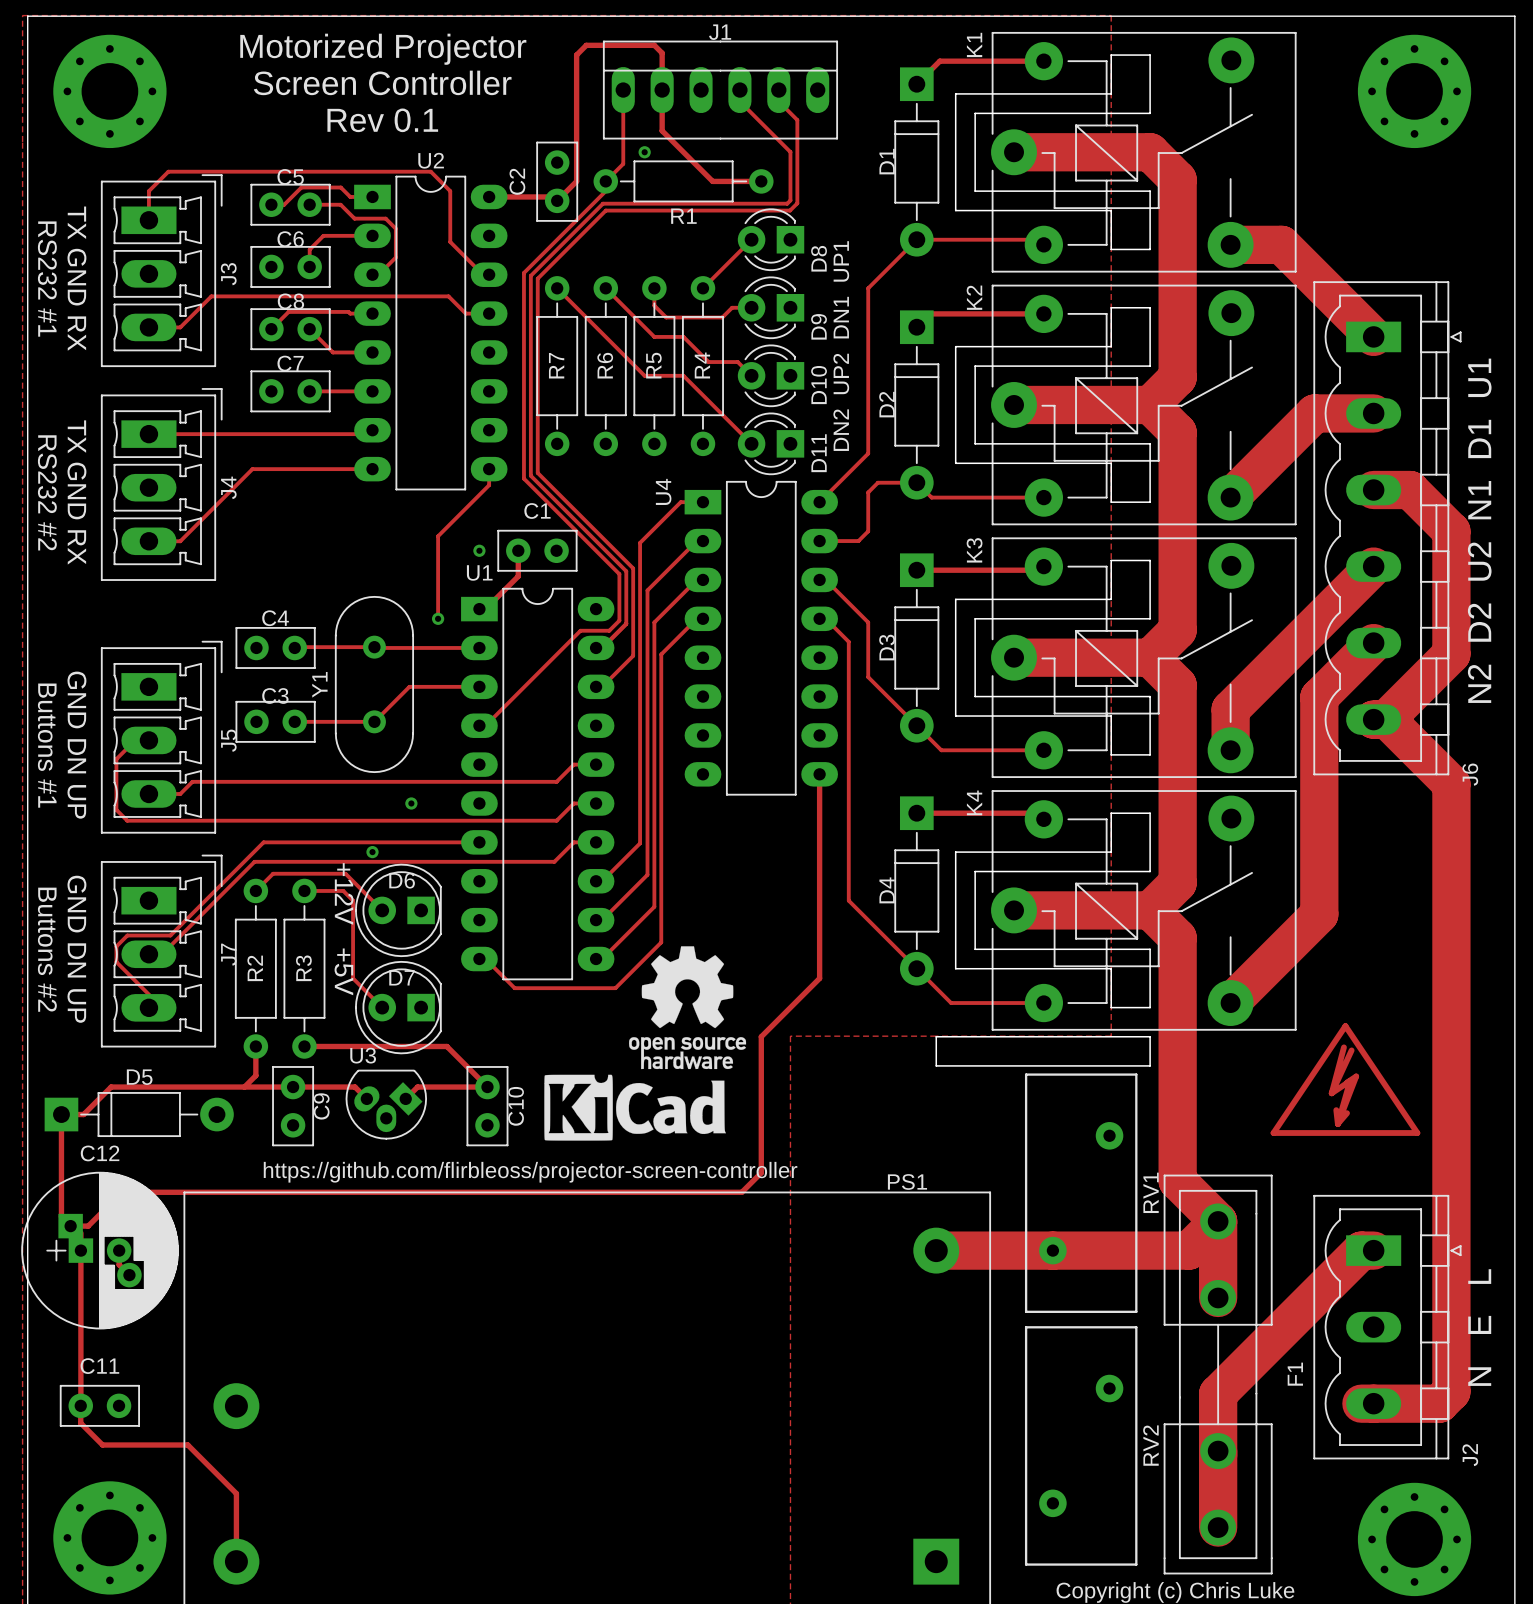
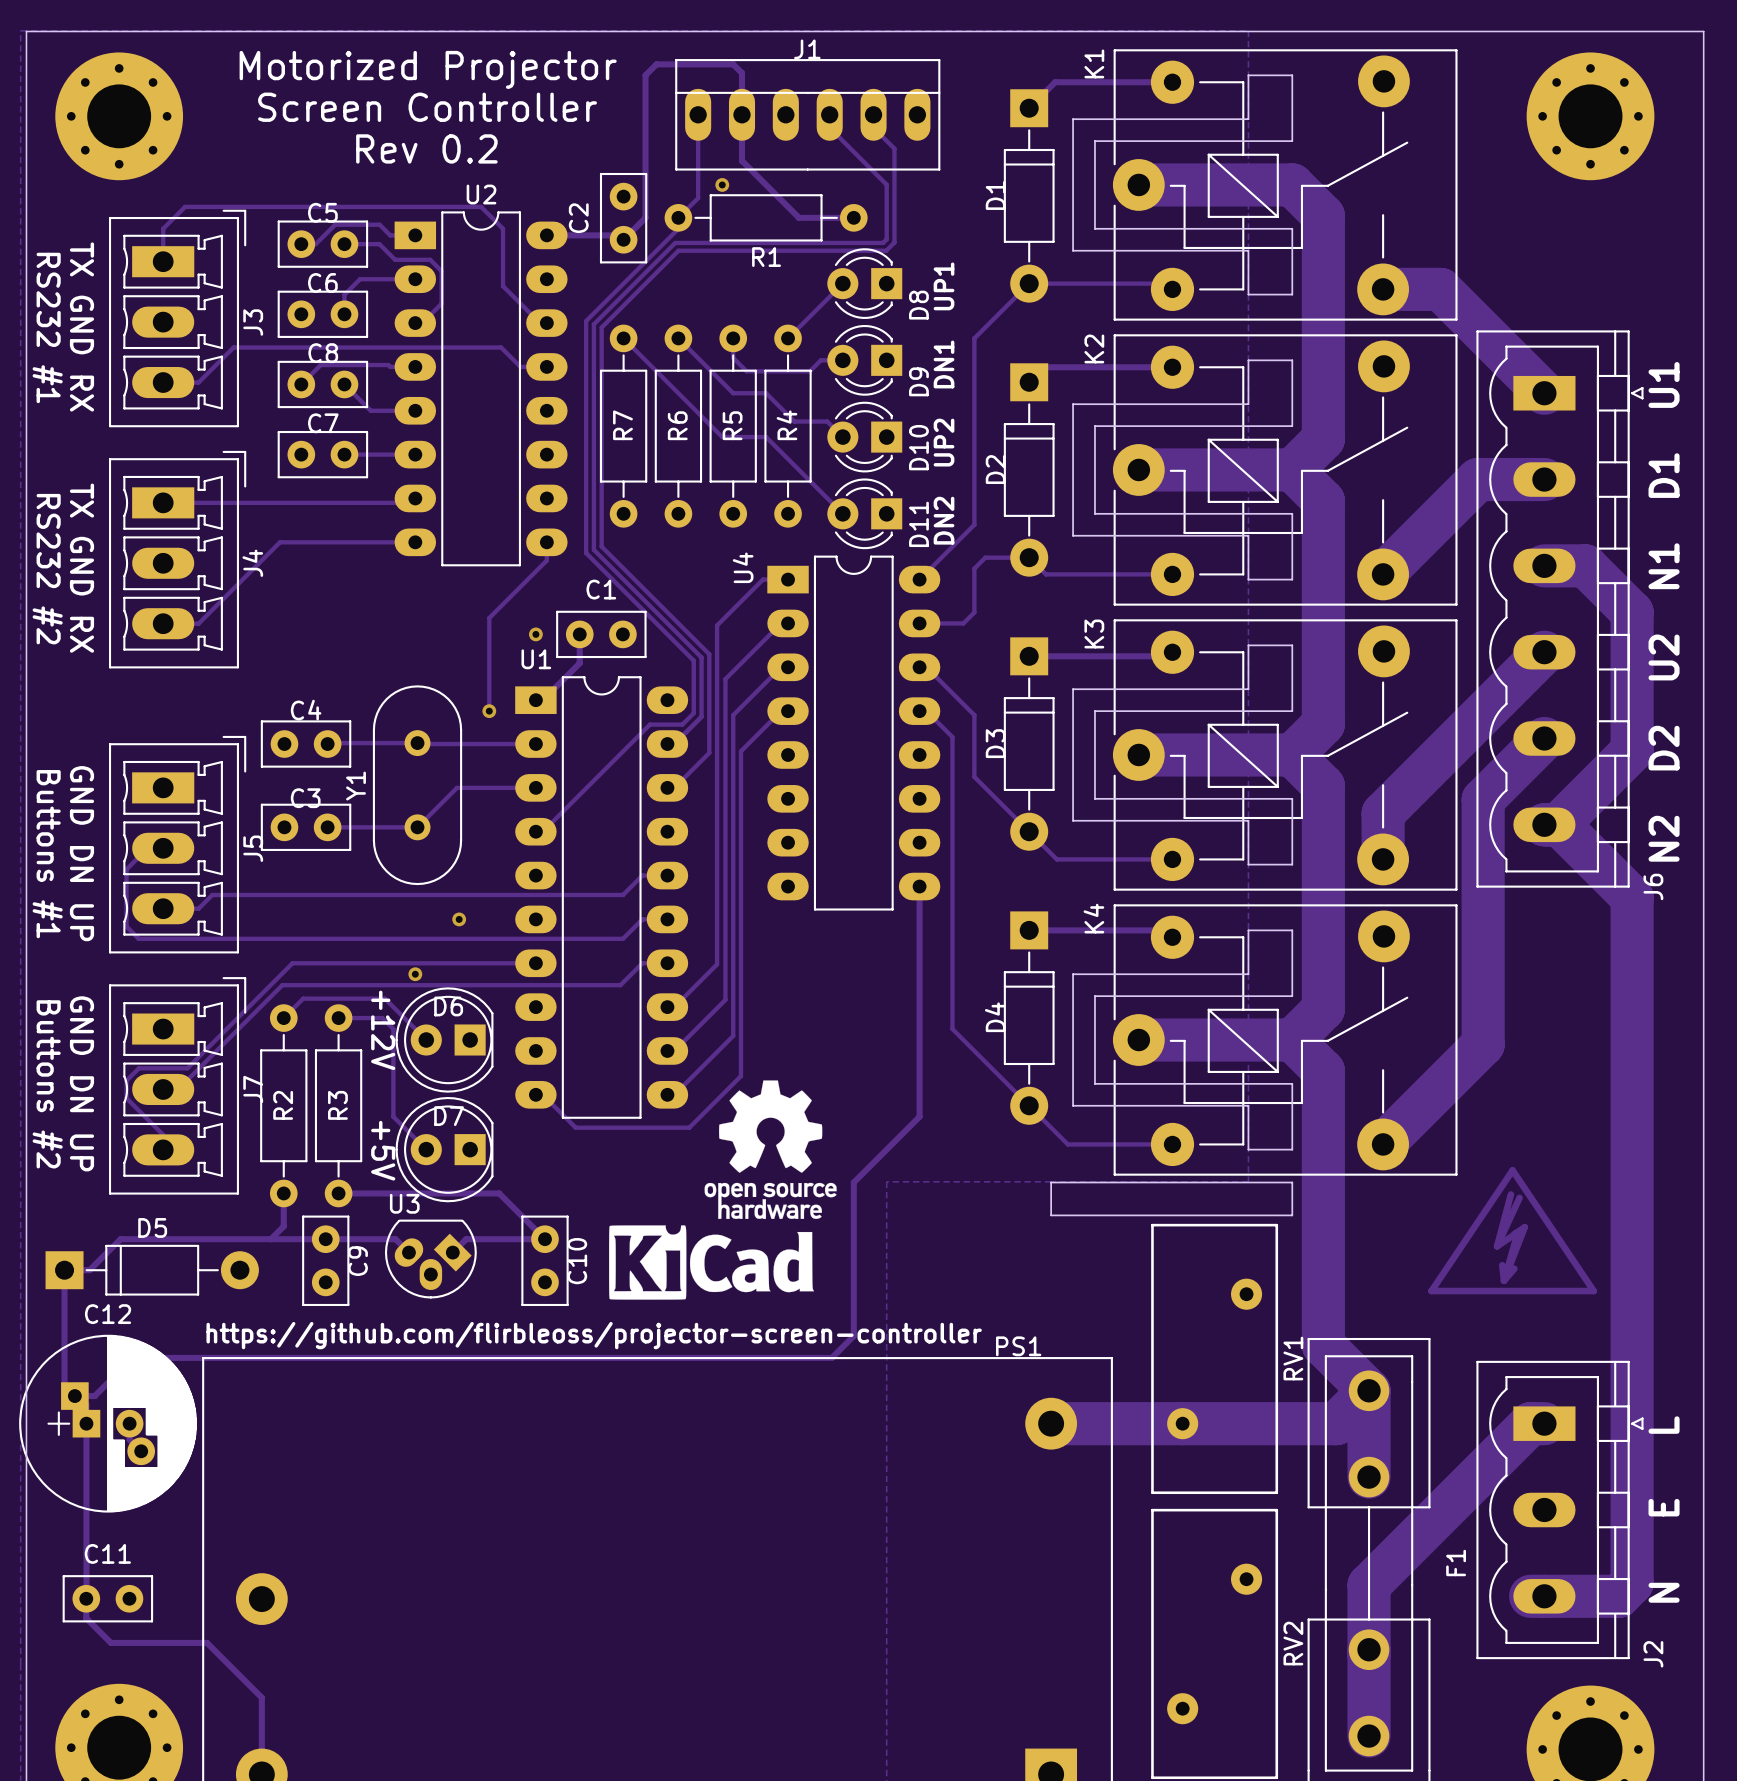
text: Rev 0.1 (382, 120) -> Rev 0.2 (426, 148)

